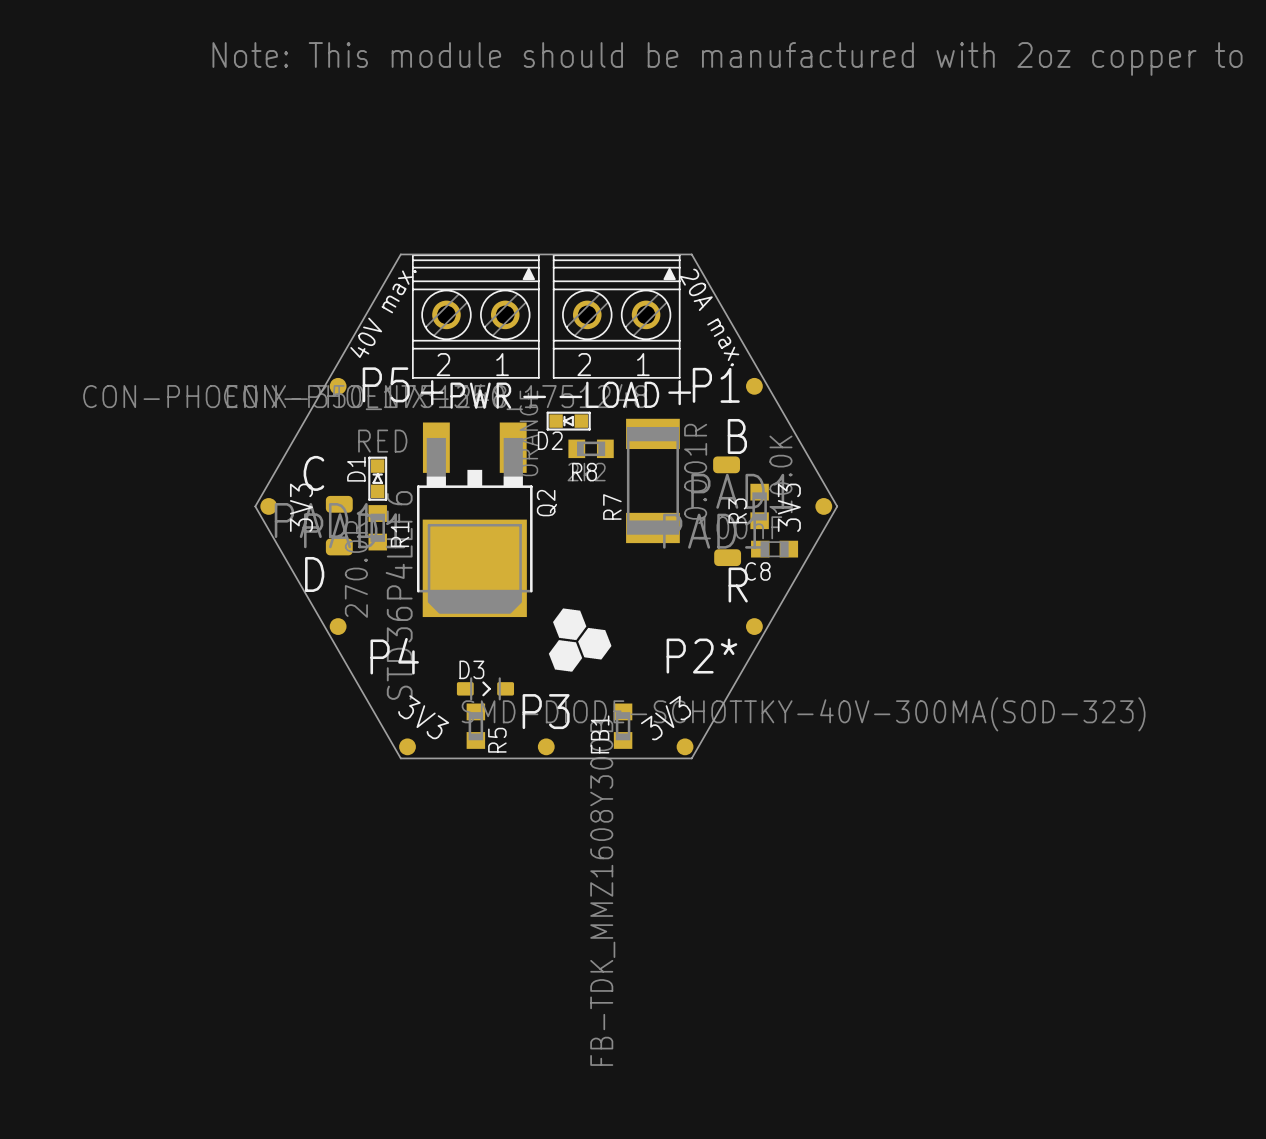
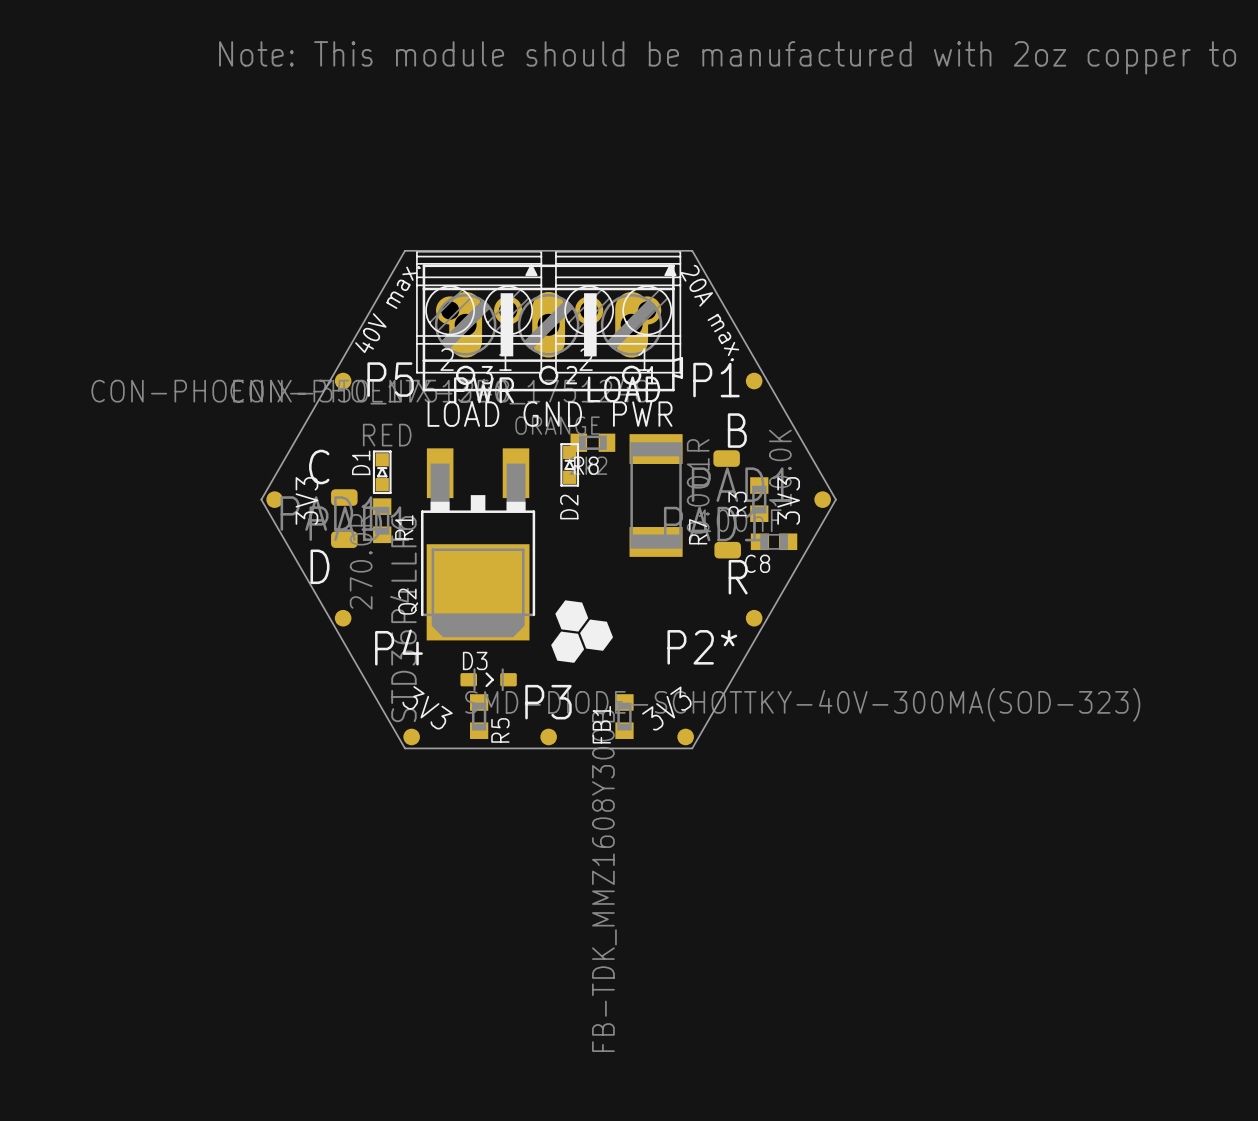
part: none -> (552, 327)
text: + (432, 392) -> none
text: + (679, 392) -> none
text: - (534, 396) -> none
text: - (570, 396) -> none
text: none -> LOAD (463, 414)
text: none -> GND (552, 414)
text: none -> PWR (642, 414)
D2 rotation: 0° (568, 421) -> 90° clockwise (569, 464)
D2 position: (568, 421) -> (569, 464)
R7 position: (652, 480) -> (656, 495)
Q2 name position: Q2 (546, 503) -> Q2 (408, 601)
R7 name position: R7 (612, 506) -> R7 (698, 531)
Q2 position: (474, 519) -> (478, 544)

